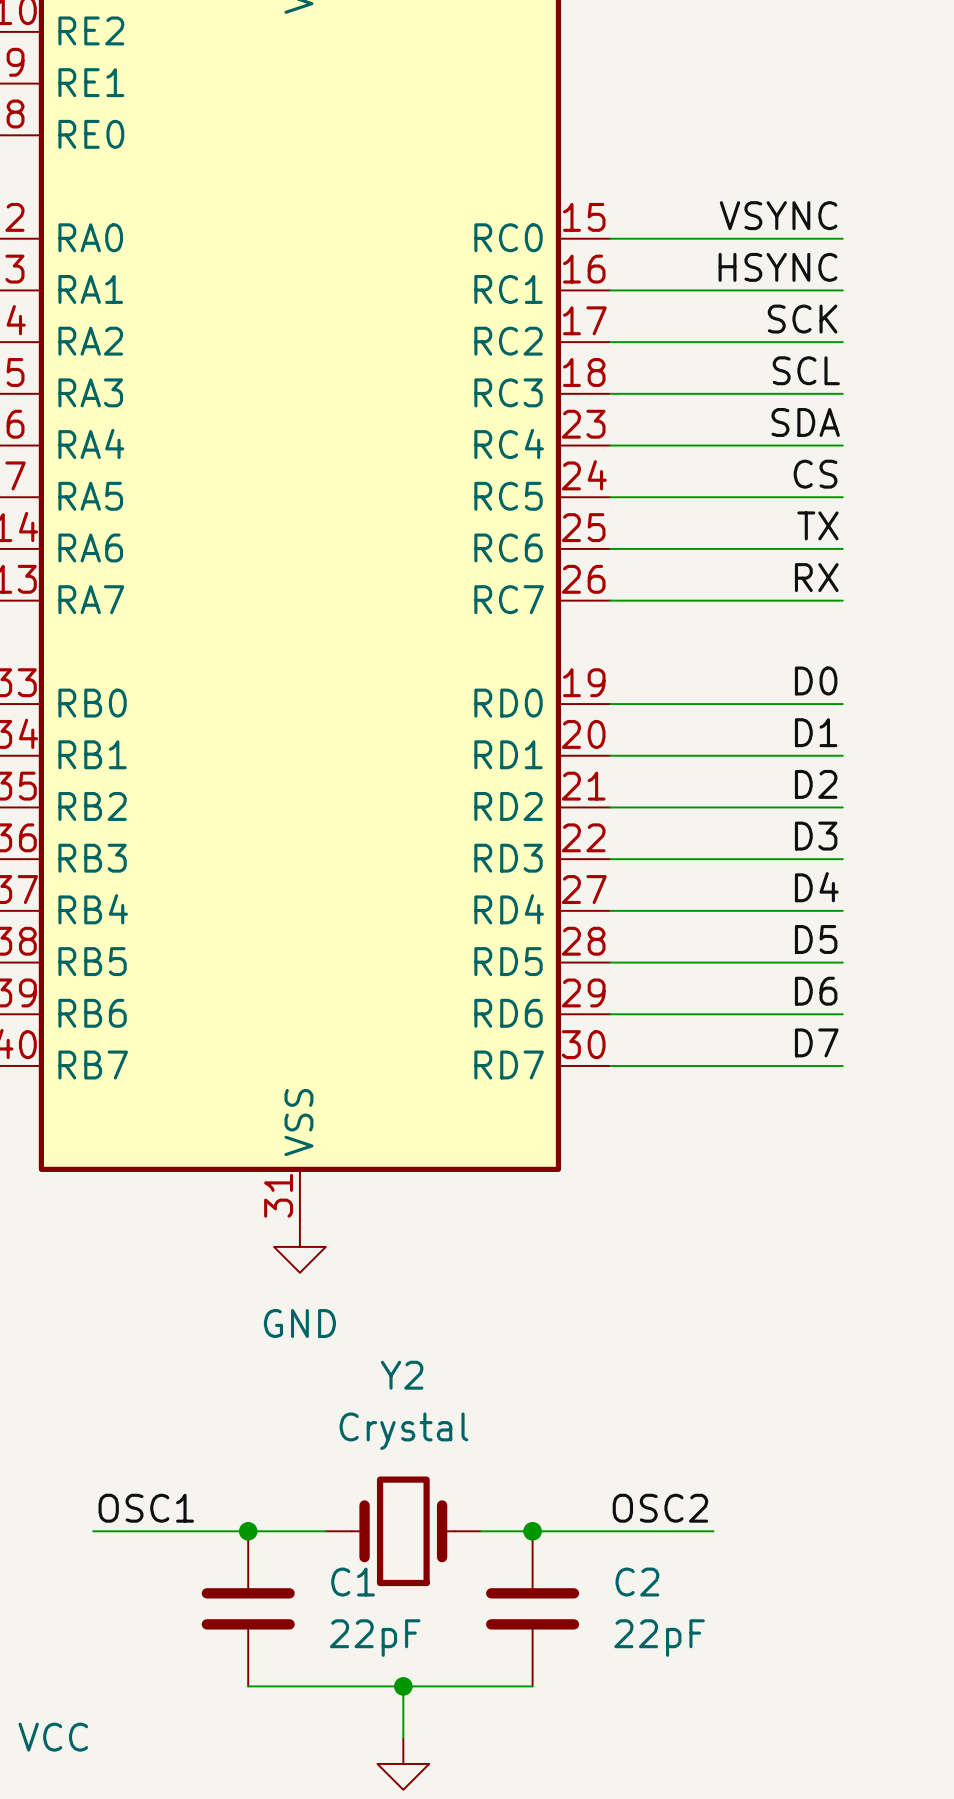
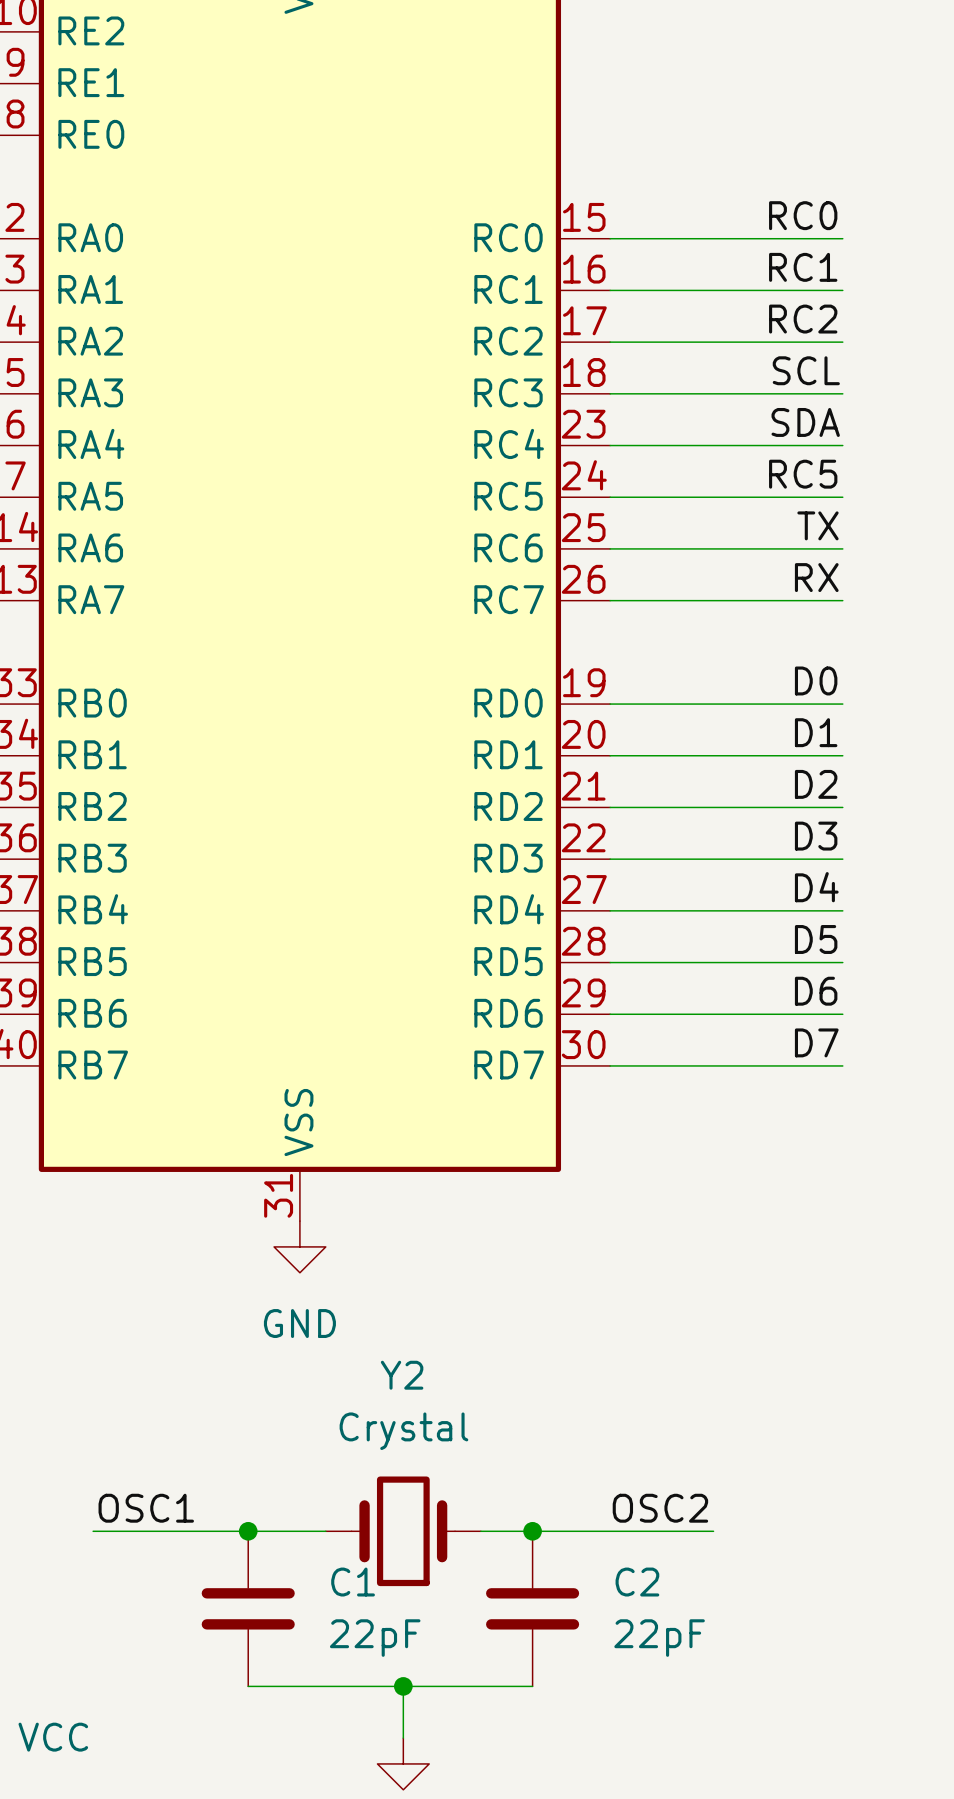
label: VSYNC (778, 215) -> RC0 (803, 215)
label: HSYNC (777, 267) -> RC1 (803, 267)
label: SCK (802, 319) -> RC2 (803, 319)
label: CS (815, 474) -> RC5 (803, 474)

